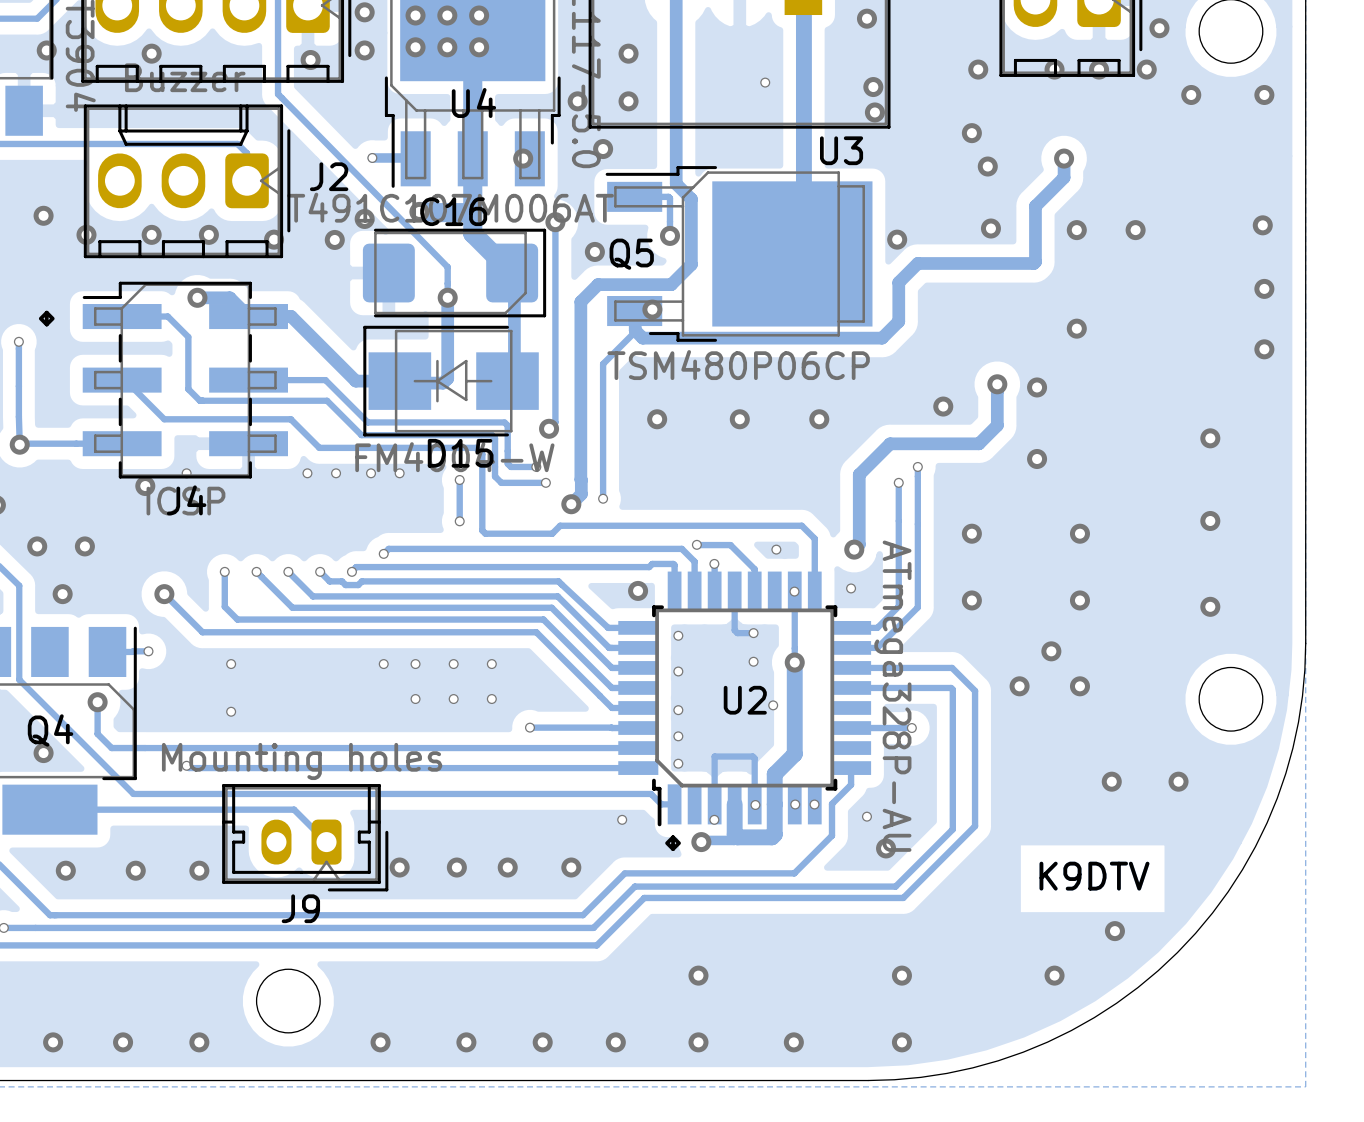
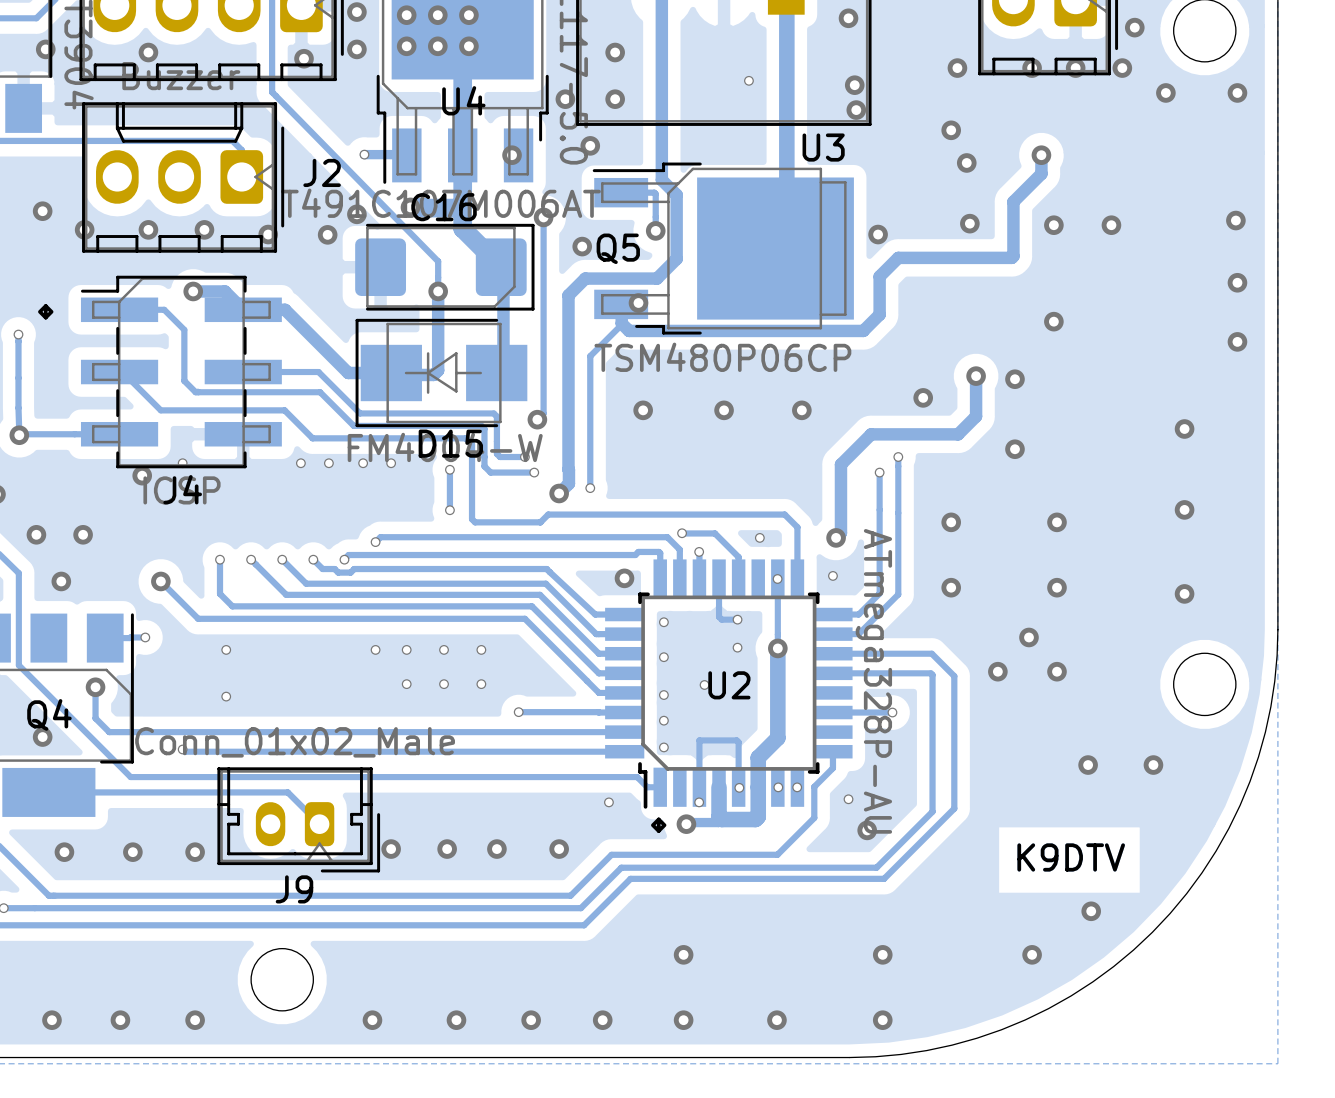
via position: (773, 705) -> (704, 684)
J9 value: Mounting holes (302, 761) -> Conn_01x02_Male (295, 742)

